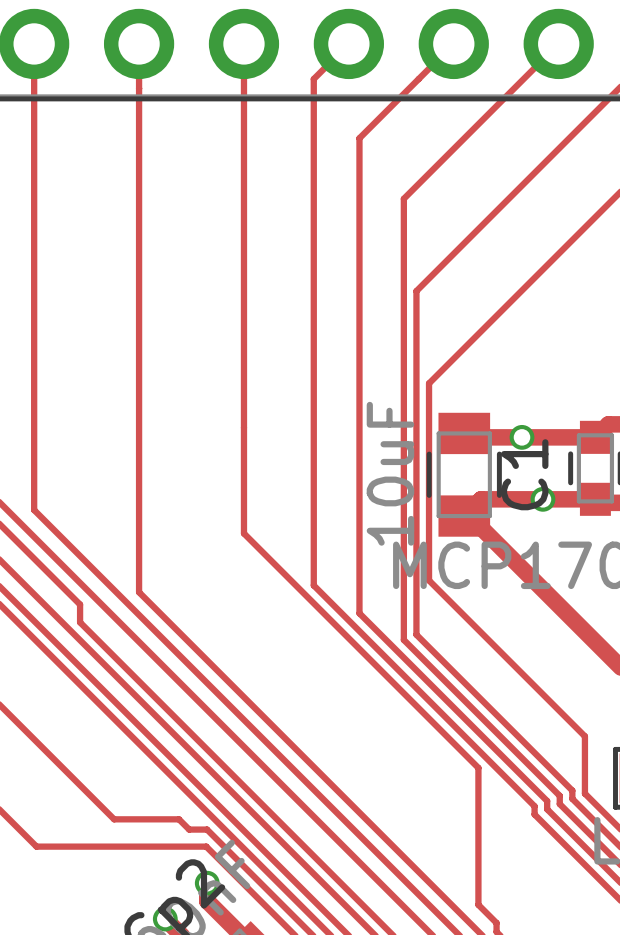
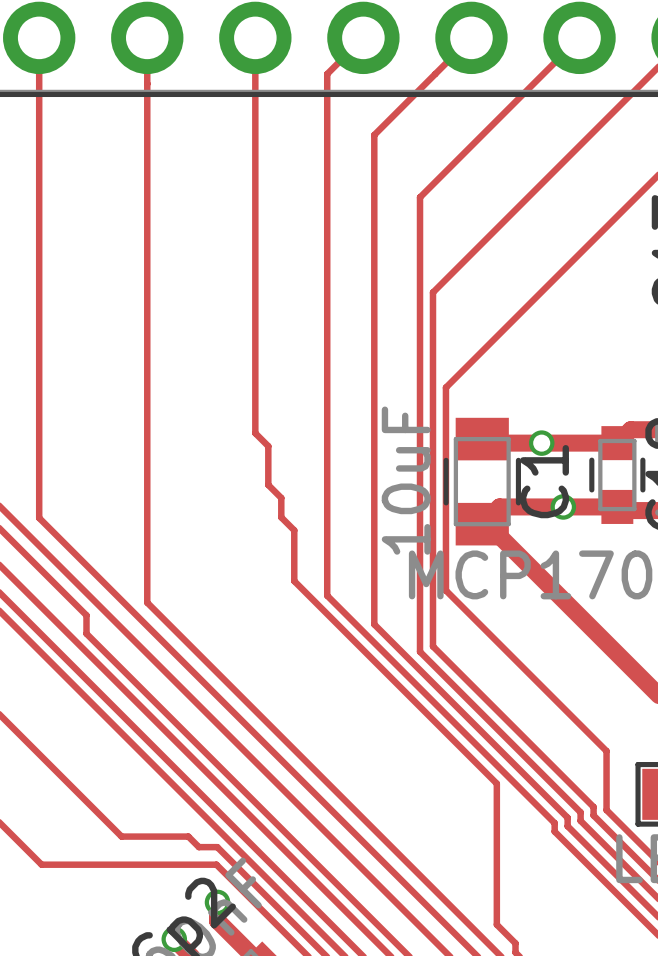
track: (243, 427) (243, 533) (281, 571) -> (255, 433) (268, 446) (268, 485) (281, 497) (281, 517) (294, 530) (294, 581)

